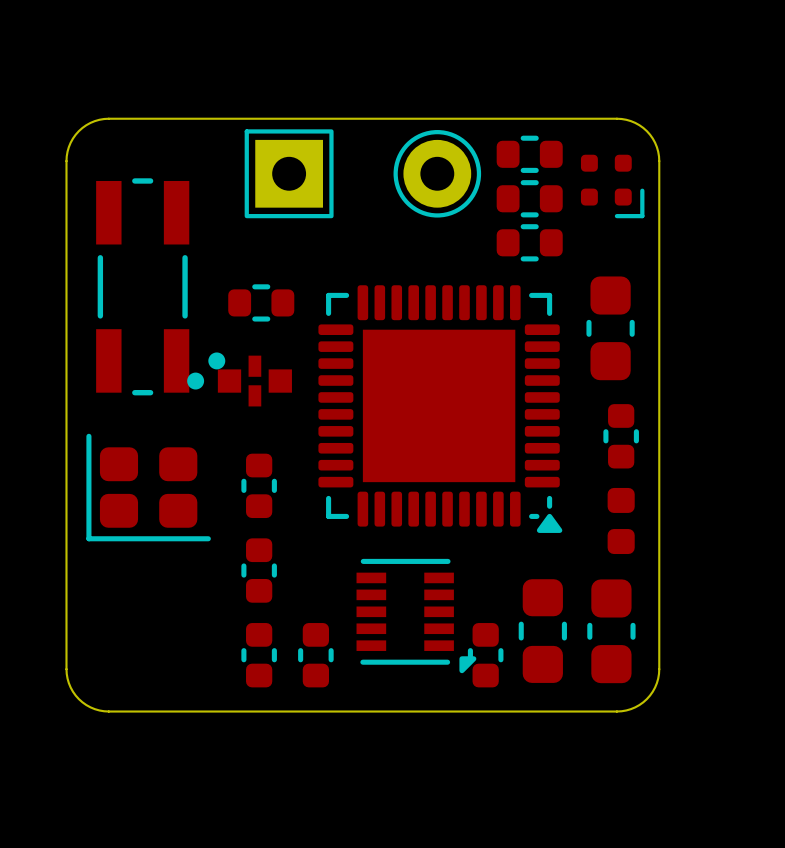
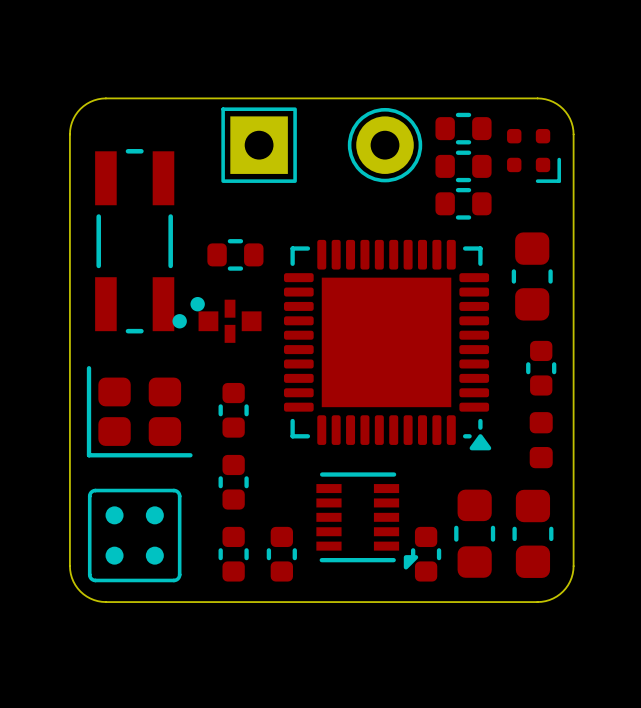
line: none -> (95, 490) (173, 490) (177, 492) (179, 496) (179, 574) (177, 578) (173, 580) (95, 580) (91, 578) (89, 574) (89, 496) (91, 492) (95, 490)
drawing: none -> [105, 506, 164, 565]

